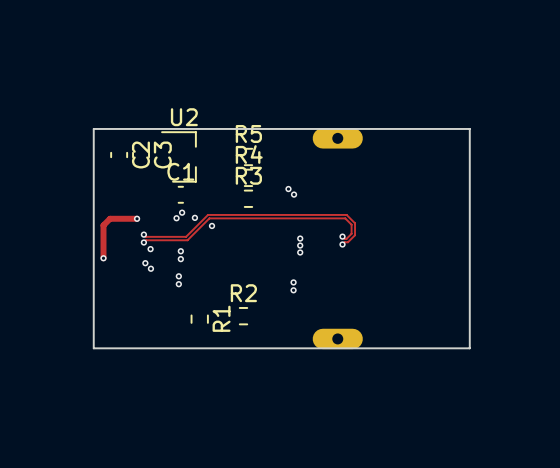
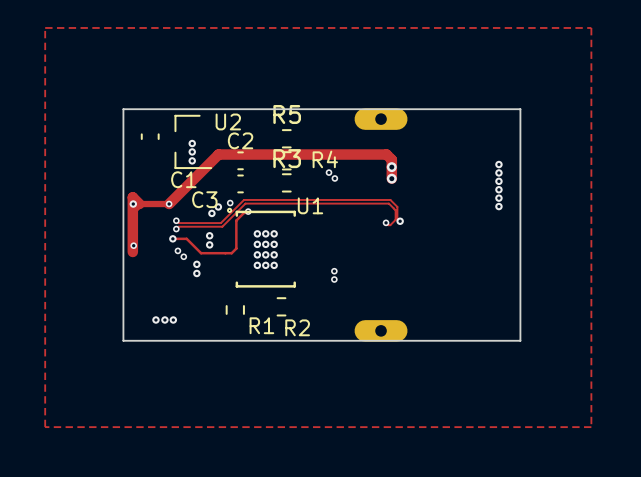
zone outline: none -> (45, 27) (45, 427) (591, 427) (591, 27) (45, 27)
U2 name position: U2 (184, 117) -> U2 (228, 121)
C2 name: C2 (140, 154) -> C1 (183, 179)
C3 rotation: 0° (141, 154) -> 90° clockwise (240, 183)
C3 position: (141, 154) -> (240, 183)
C3 name position: C3 (162, 154) -> C3 (204, 199)
R4 name position: R4 (249, 154) -> R4 (325, 159)
U2 rotation: 0° (178, 156) -> 180° (193, 141)
via: none -> (192, 143)
via: none -> (192, 151)
via: none -> (192, 160)
C2: none -> (240, 160)
via: none -> (498, 164)
via: none -> (391, 167)
via: none -> (498, 172)
C1: (180, 194) -> none
track: none -> (391, 178) (391, 159) (386, 154) (218, 154) (169, 204)
via: none -> (391, 178)
via: none -> (498, 181)
via: none -> (498, 189)
via: (182, 212) -> none
via: none -> (498, 198)
via: none -> (133, 204)
track: none -> (139, 204) (132, 197) (132, 251)
via: (176, 218) -> none
via: none -> (218, 206)
track: (353, 221) (355, 223) (355, 235) (342, 244) -> (397, 206) (397, 218) (400, 221)
via: none -> (498, 206)
via: none -> (211, 213)
track: none -> (248, 212) (244, 212) (236, 220) (236, 248) (231, 253) (201, 253) (186, 238) (172, 238)
via: none -> (400, 221)
via: (300, 238) -> none
via: (342, 244) -> none
via: (300, 245) -> none
via: none -> (257, 233)
via: none -> (265, 233)
via: none -> (274, 233)
via: none -> (209, 235)
via: (150, 249) -> none
via: none -> (172, 238)
via: (180, 251) -> none
via: (300, 252) -> none
via: none -> (209, 244)
via: none -> (257, 244)
via: none -> (265, 244)
via: none -> (274, 244)
via: (180, 259) -> none
U1: none -> (261, 247)
via: none -> (257, 254)
via: none -> (265, 254)
via: none -> (274, 254)
via: none -> (196, 264)
via: (178, 276) -> none
via: none -> (257, 265)
via: none -> (265, 265)
via: none -> (274, 265)
via: none -> (196, 273)
via: (178, 284) -> none
R2 name position: R2 (243, 293) -> R2 (297, 327)
R1 name rotation: 0° (221, 318) -> 90° clockwise (261, 325)
via: none -> (155, 319)
via: none -> (164, 319)
via: none -> (173, 319)

